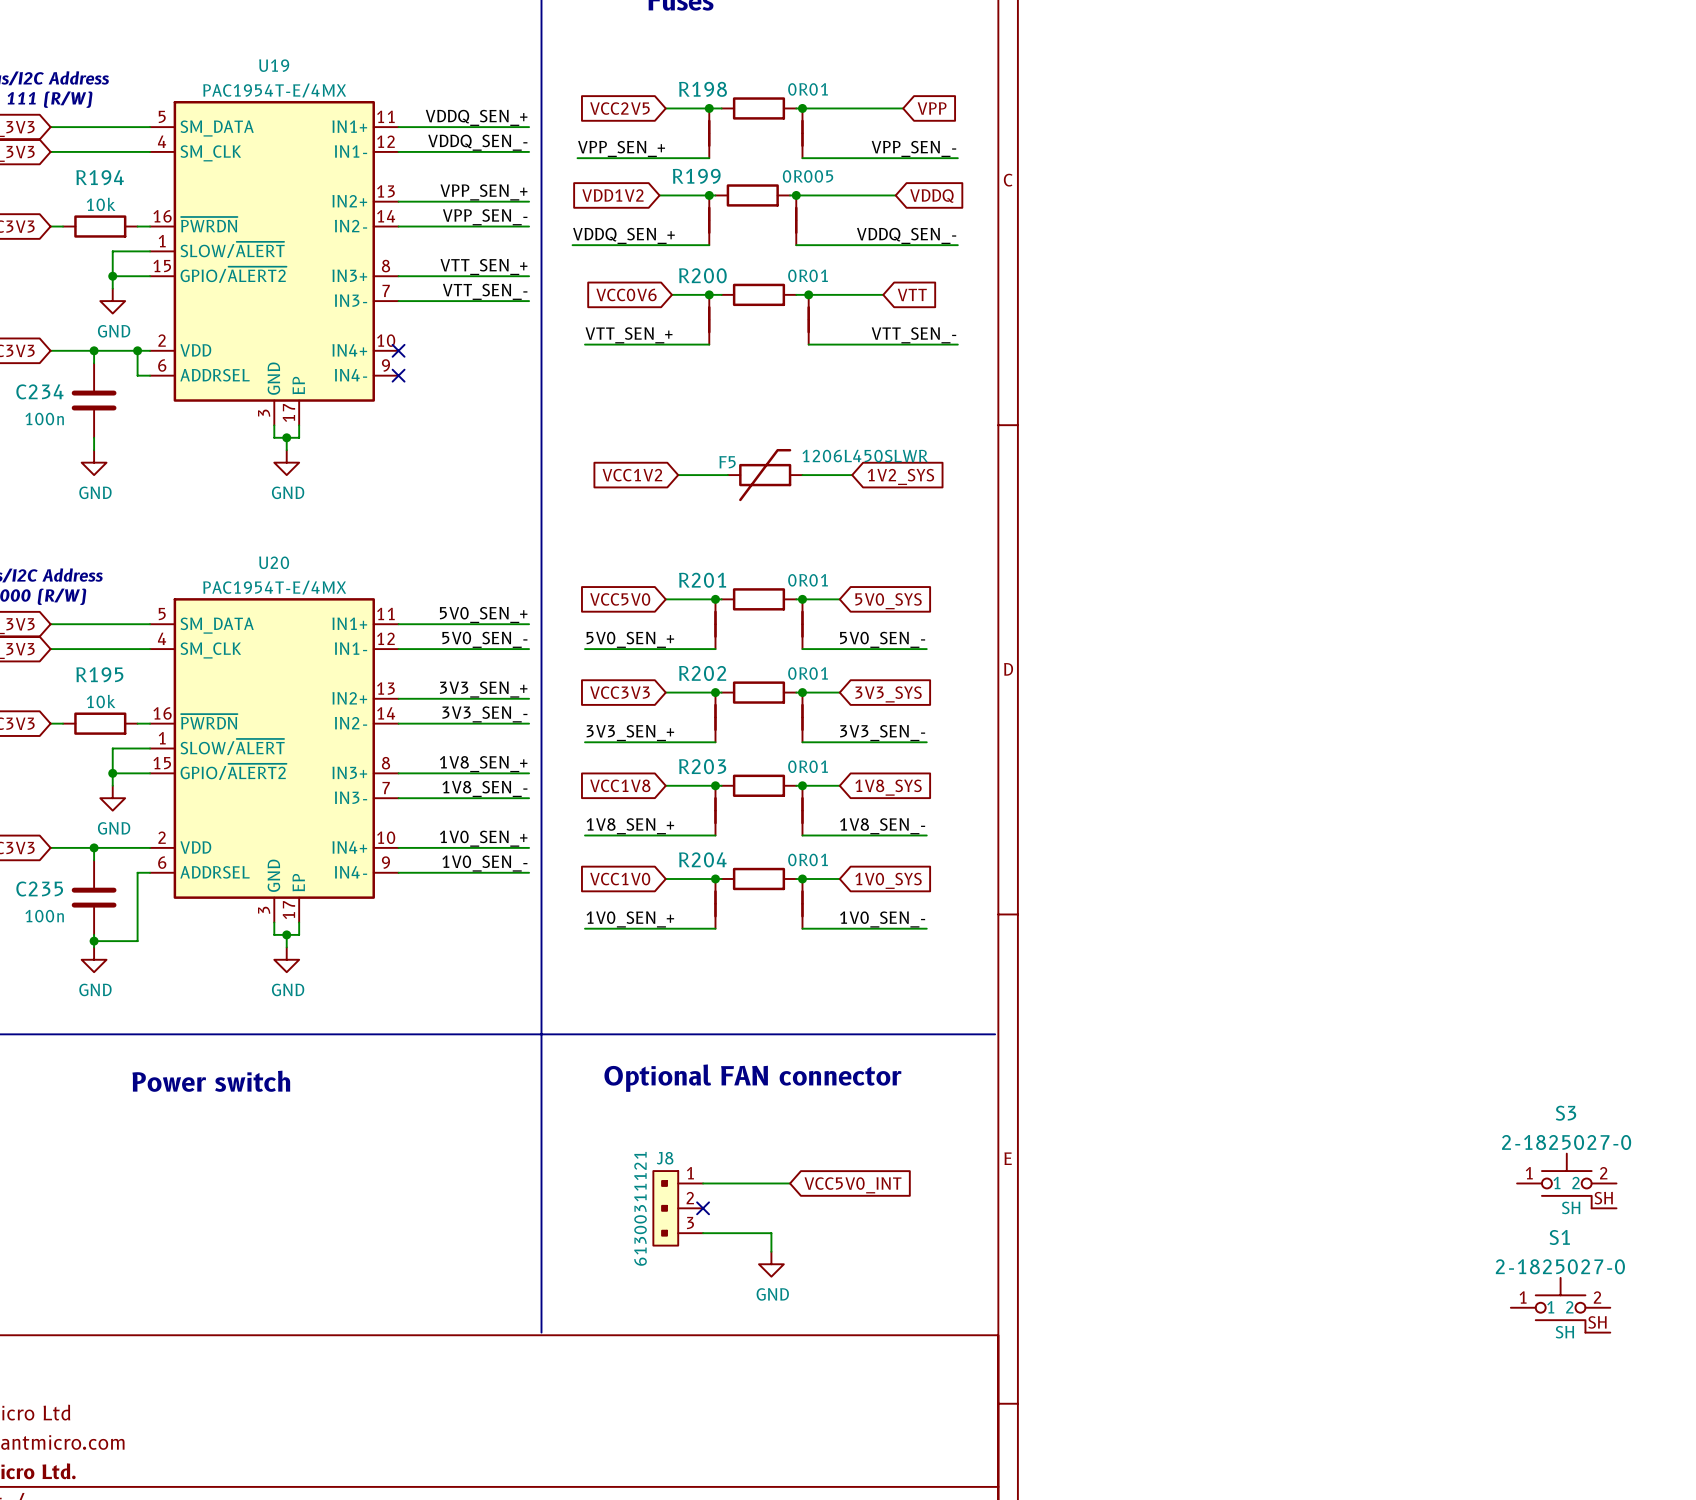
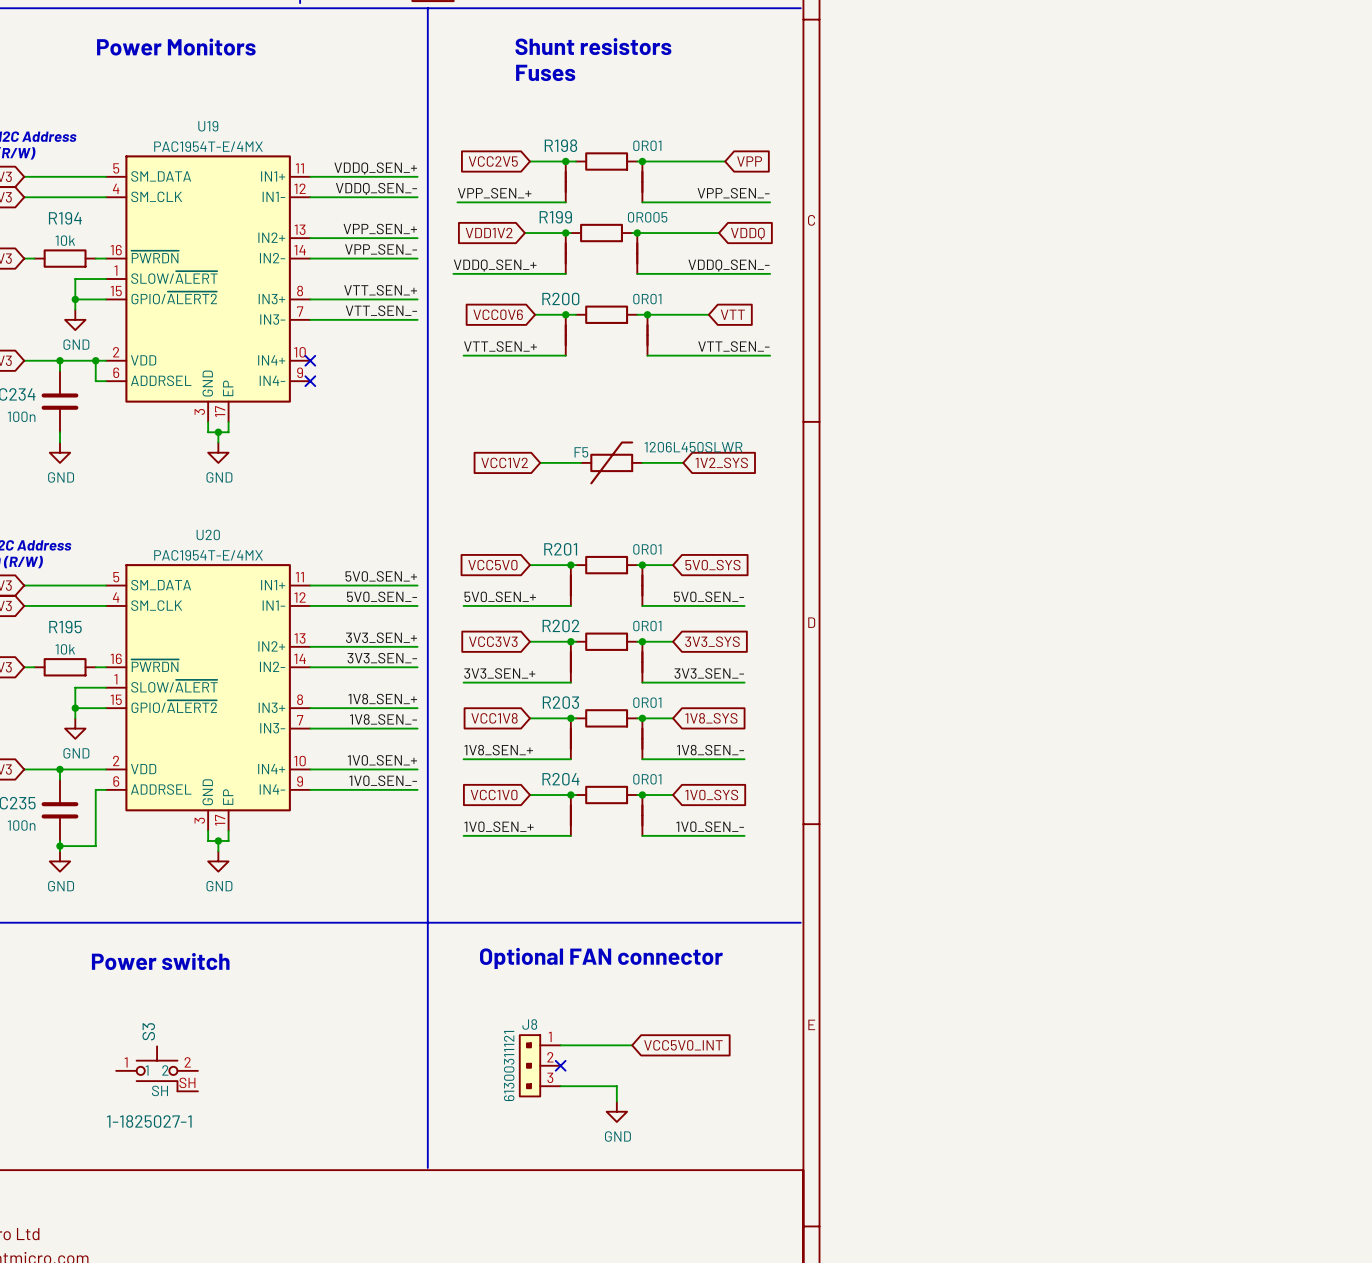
S3 name rotation: 0° (1566, 1113) -> 90° counterclockwise (148, 1031)
S3 value: 2-1825027-0 (1566, 1142) -> 1-1825027-1 (149, 1121)
S3 position: (1566, 1181) -> (157, 1069)
S1: 2-1825027-0 (1560, 1305) -> none

